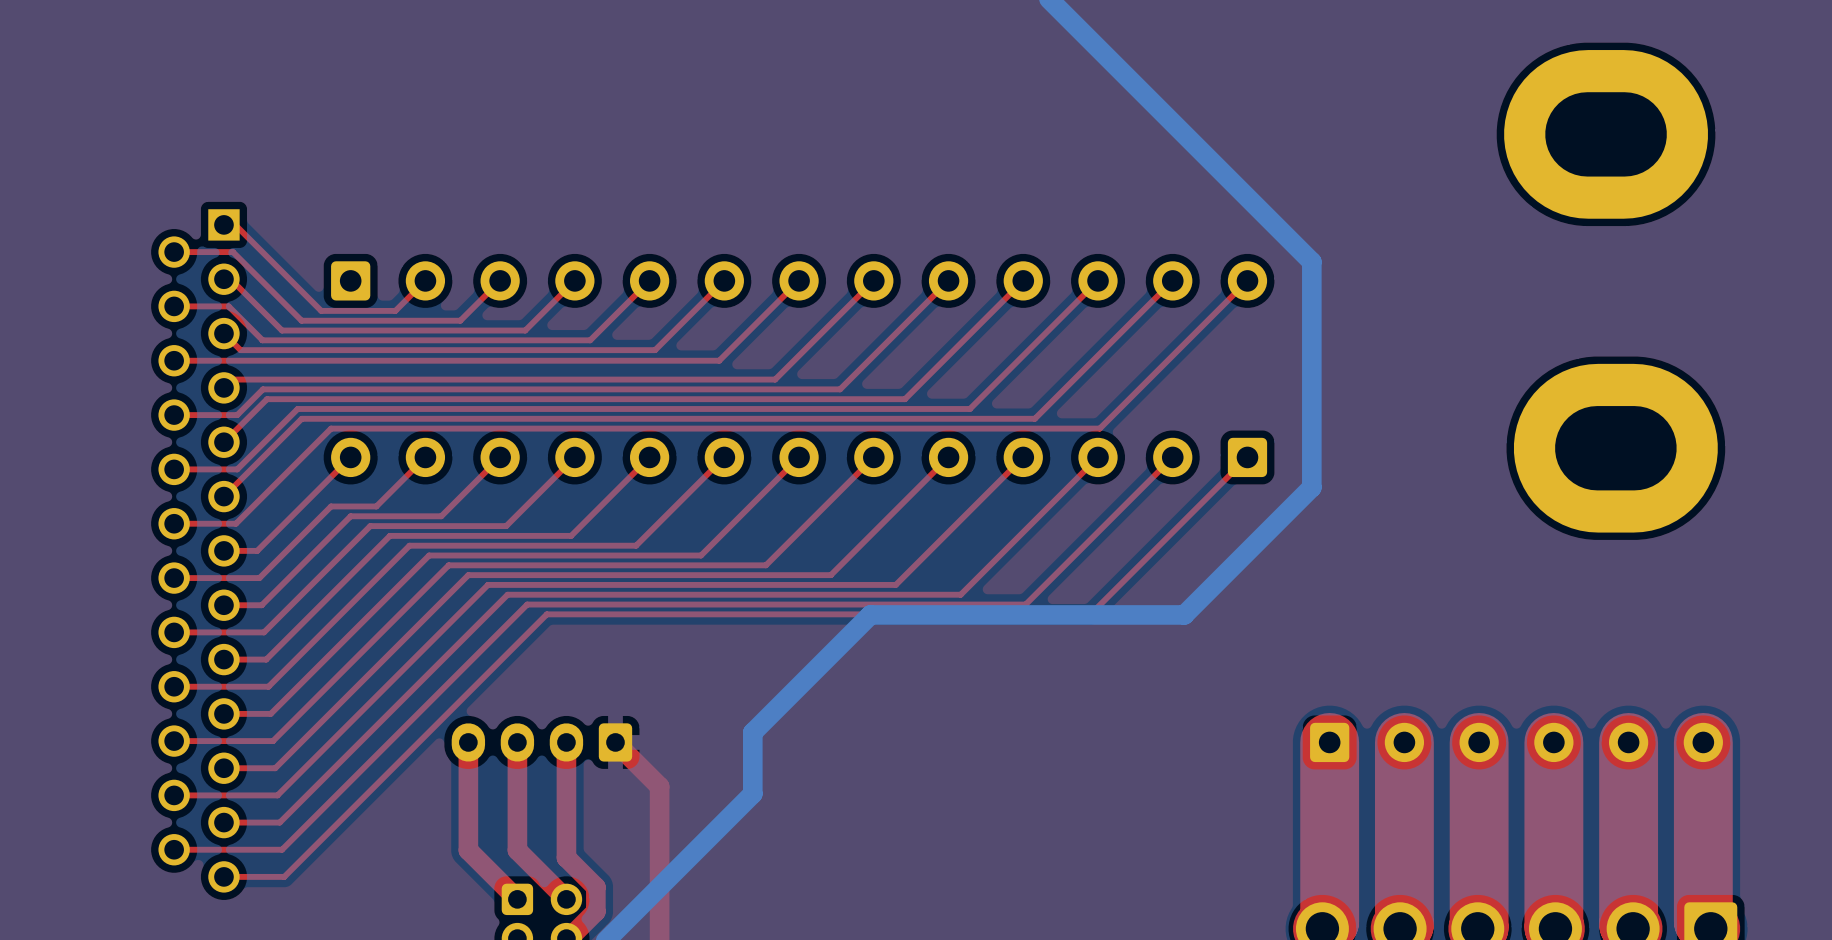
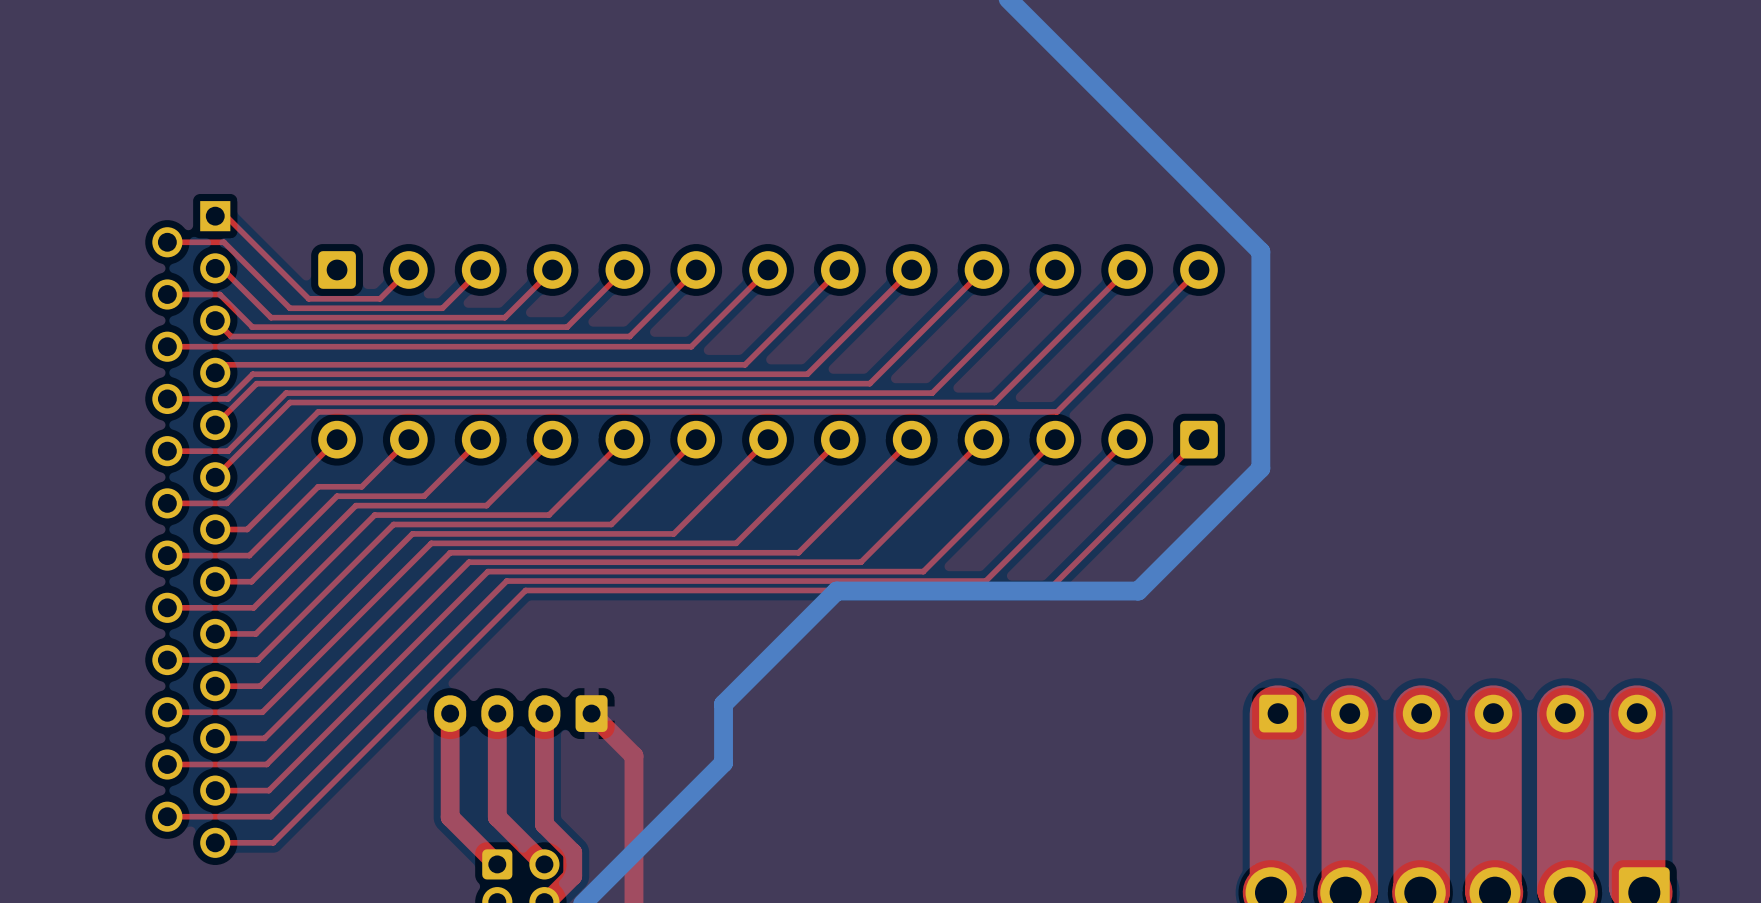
part: (1606, 134) -> none
part: (1615, 448) -> none

